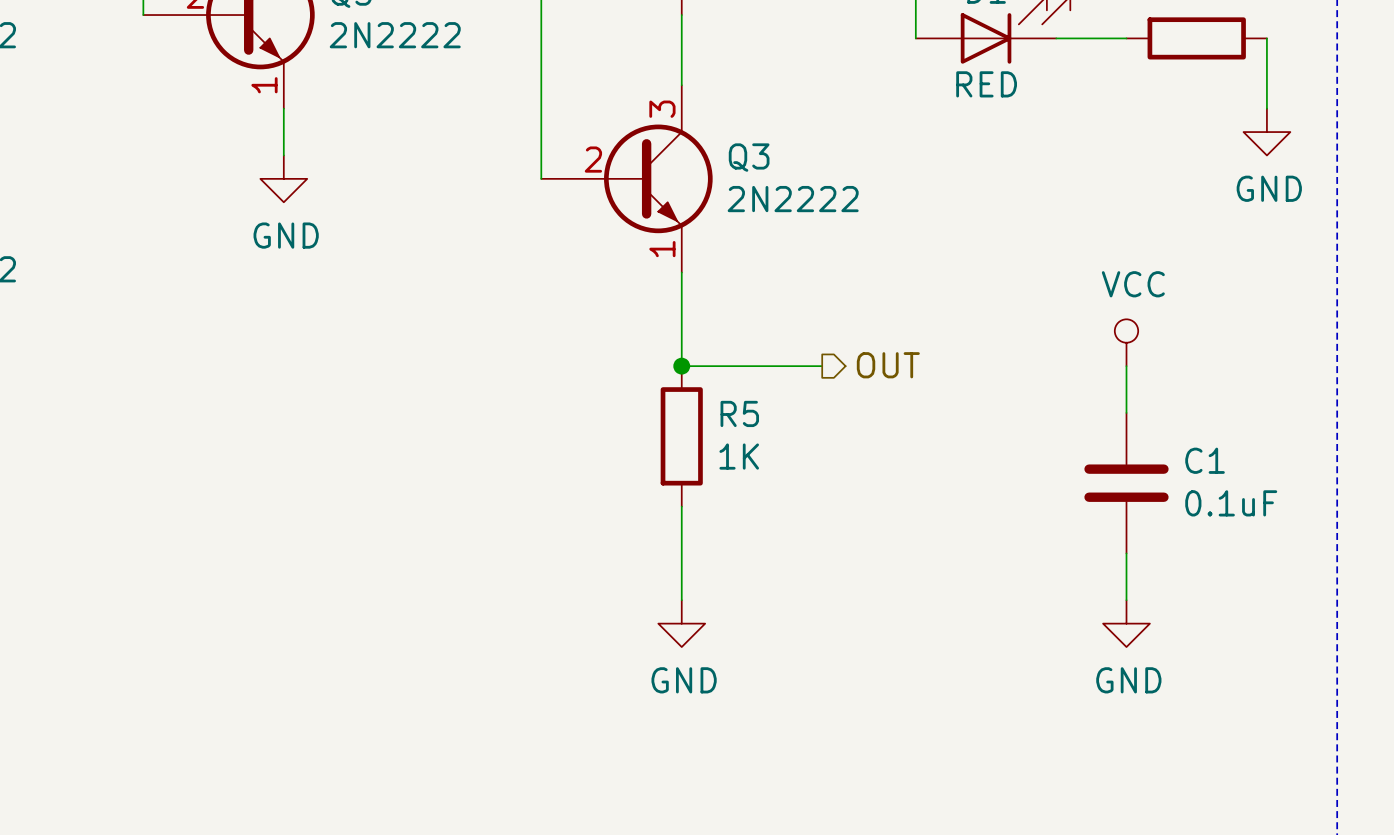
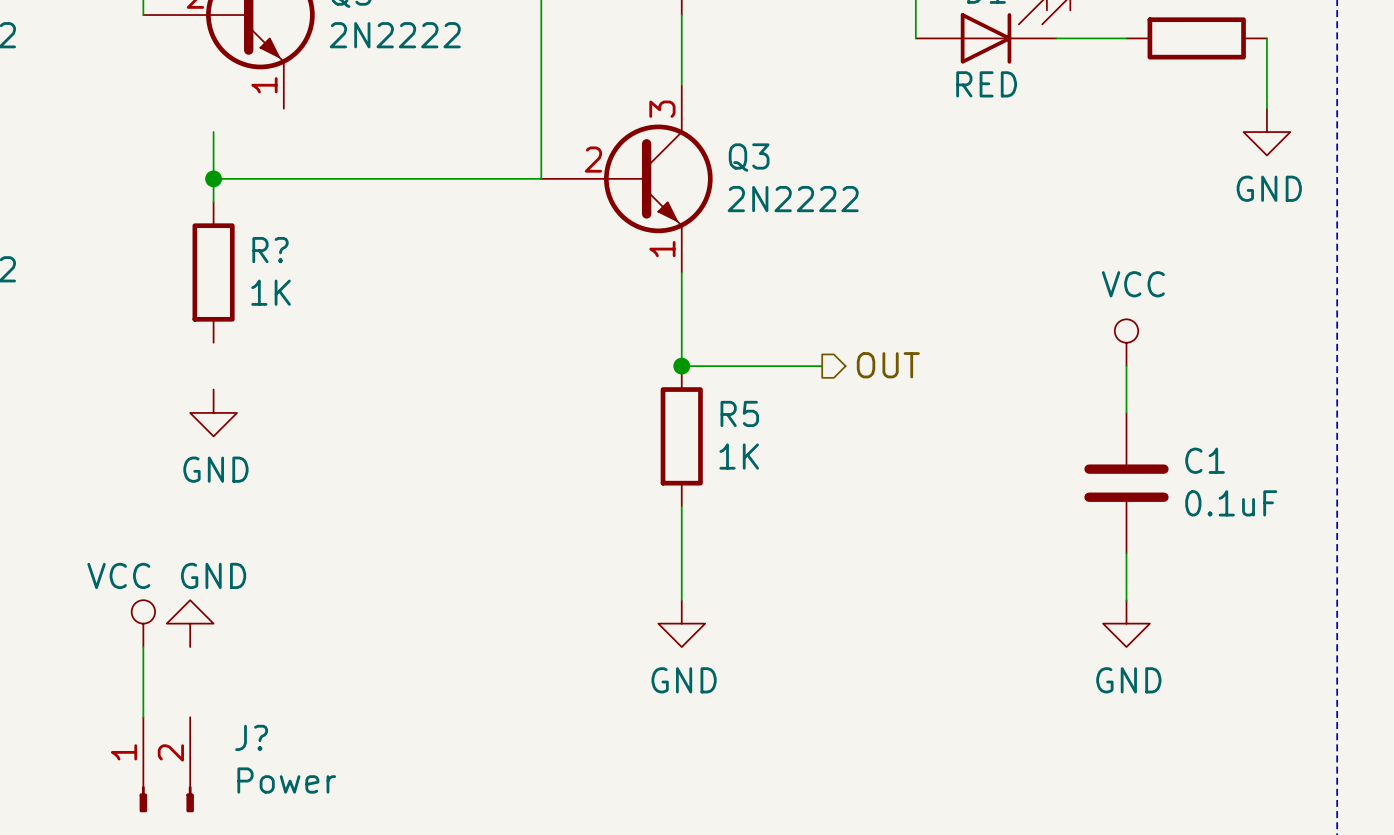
wire: (283, 108) (283, 155) -> none
wire: none -> (213, 132) (213, 202)
wire: none -> (213, 178) (541, 178)
junction: none -> (213, 178)
power symbol: GND (283, 178) -> none
R?: none -> 1K (213, 272)
power symbol: none -> GND (213, 412)
power symbol: none -> VCC (143, 623)
power symbol: none -> GND (190, 623)
wire: none -> (143, 647) (143, 717)
J?: none -> Power (166, 764)

